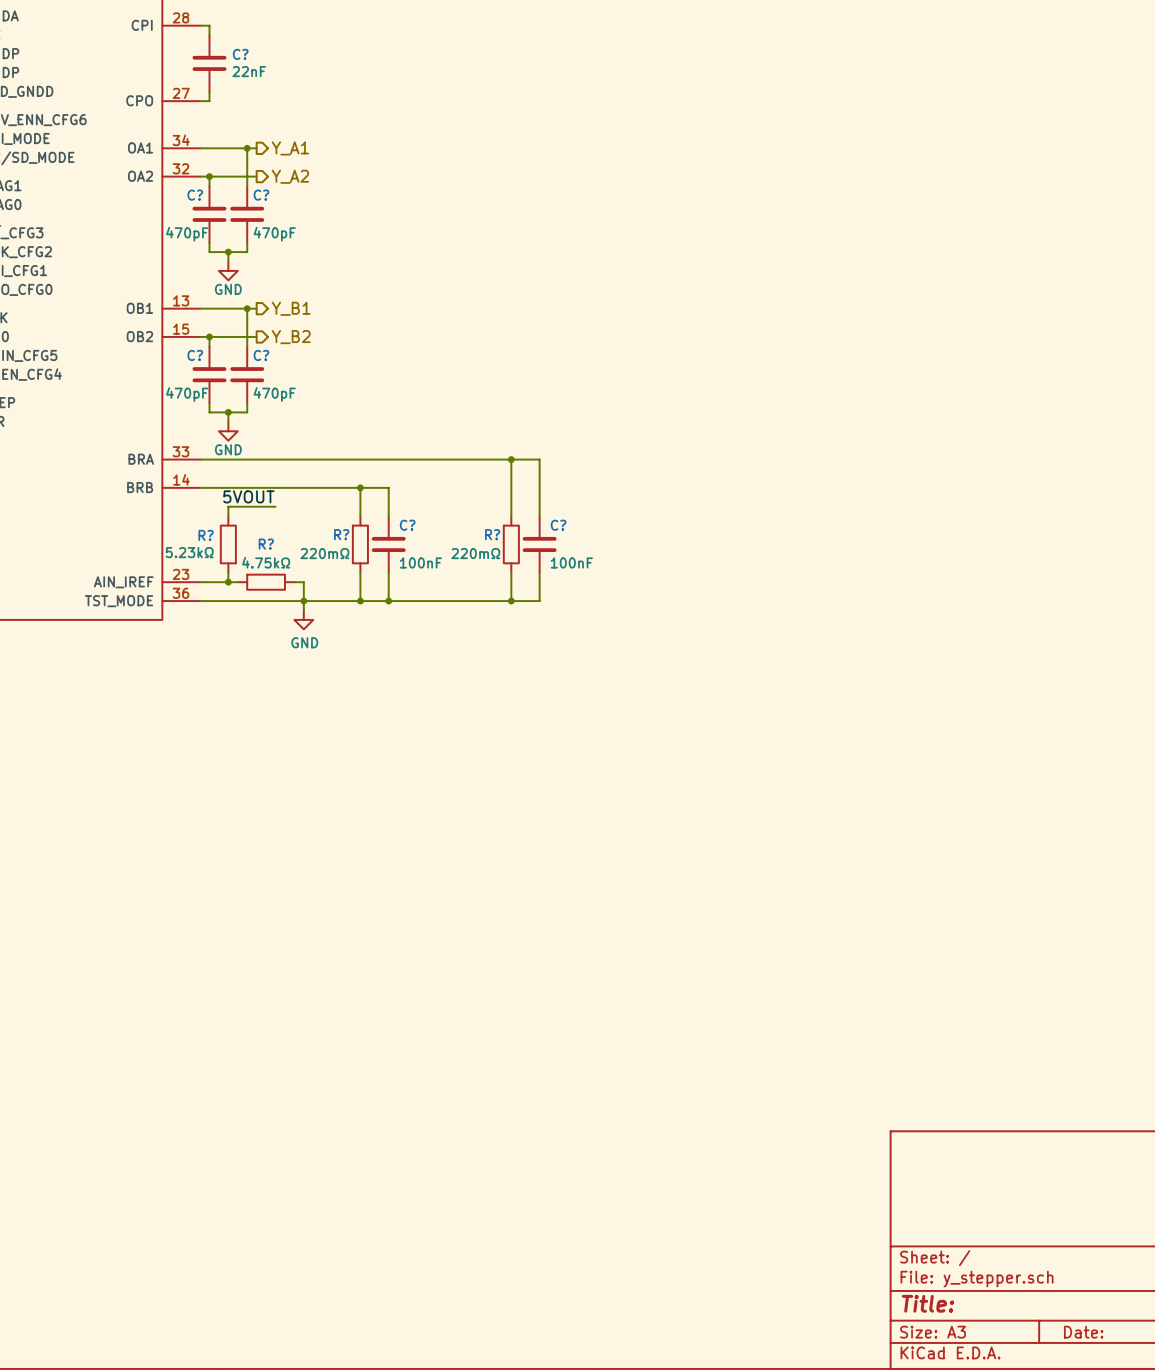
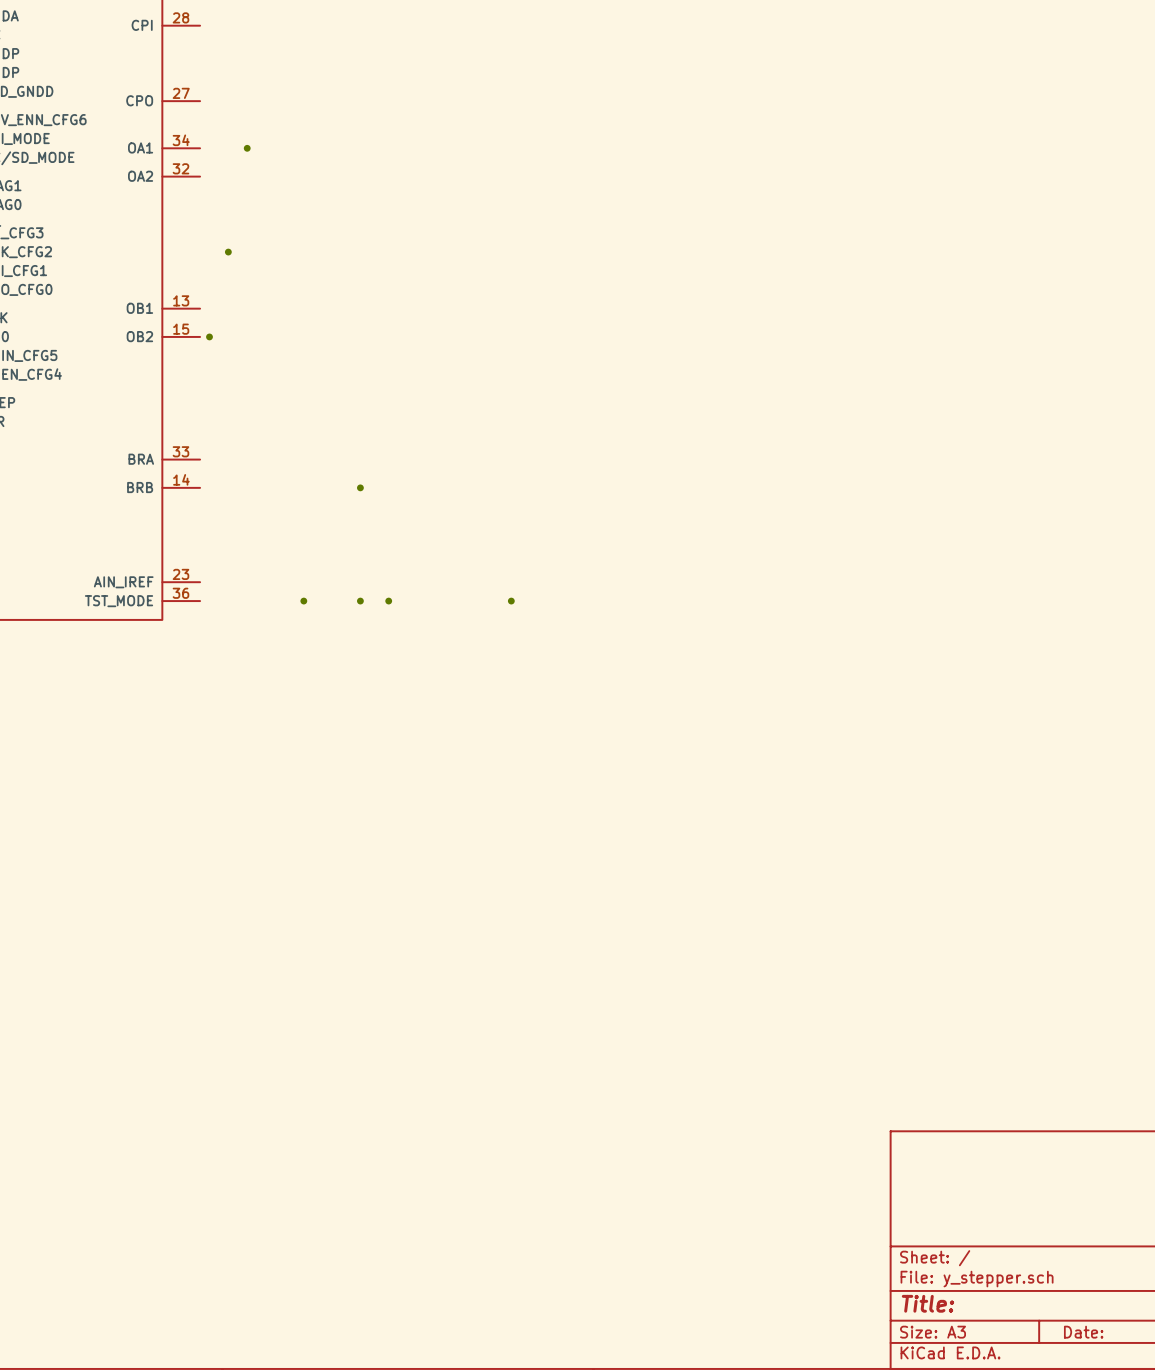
wire: (200, 25) (209, 25) (209, 35) -> none
C?: 22nF (209, 63) -> none
wire: (209, 91) (209, 101) (200, 101) -> none
wire: (200, 148) (256, 148) -> none
wire: (247, 148) (247, 186) -> none
hierarchical label: Y_A1 (290, 148) -> none
wire: (200, 176) (256, 176) -> none
wire: (209, 176) (209, 186) -> none
junction: (209, 176) -> none
hierarchical label: Y_A2 (290, 176) -> none
C?: 470pF (209, 214) -> none
C?: 470pF (247, 214) -> none
wire: (209, 242) (209, 252) (247, 252) (247, 242) -> none
wire: (228, 252) (228, 261) -> none
power symbol: GND (228, 270) -> none
wire: (200, 308) (256, 308) -> none
wire: (247, 308) (247, 346) -> none
junction: (247, 308) -> none
hierarchical label: Y_B1 (291, 308) -> none
wire: (200, 336) (256, 336) -> none
wire: (209, 336) (209, 346) -> none
hierarchical label: Y_B2 (291, 337) -> none
C?: 470pF (209, 374) -> none
C?: 470pF (247, 374) -> none
wire: (209, 402) (209, 412) (247, 412) (247, 402) -> none
wire: (228, 412) (228, 421) -> none
junction: (228, 412) -> none
power symbol: GND (228, 431) -> none
wire: (200, 459) (539, 459) (539, 516) -> none
wire: (511, 459) (511, 516) -> none
junction: (511, 459) -> none
wire: (200, 487) (388, 487) (388, 516) -> none
wire: (360, 487) (360, 516) -> none
label: 5VOUT (248, 496) -> none
wire: (275, 506) (228, 506) (228, 516) -> none
R?: 5.23kΩ (228, 544) -> none
R?: 220mΩ (360, 544) -> none
C?: 100nF (388, 544) -> none
R?: 220mΩ (511, 544) -> none
C?: 100nF (539, 544) -> none
wire: (228, 572) (228, 582) -> none
wire: (360, 572) (360, 601) -> none
wire: (388, 572) (388, 601) -> none
wire: (511, 572) (511, 601) -> none
wire: (539, 572) (539, 601) (200, 601) -> none
wire: (200, 582) (237, 582) -> none
junction: (228, 582) -> none
R?: 4.75kΩ (266, 582) -> none
wire: (294, 582) (303, 582) (303, 610) -> none
power symbol: GND (303, 619) -> none

